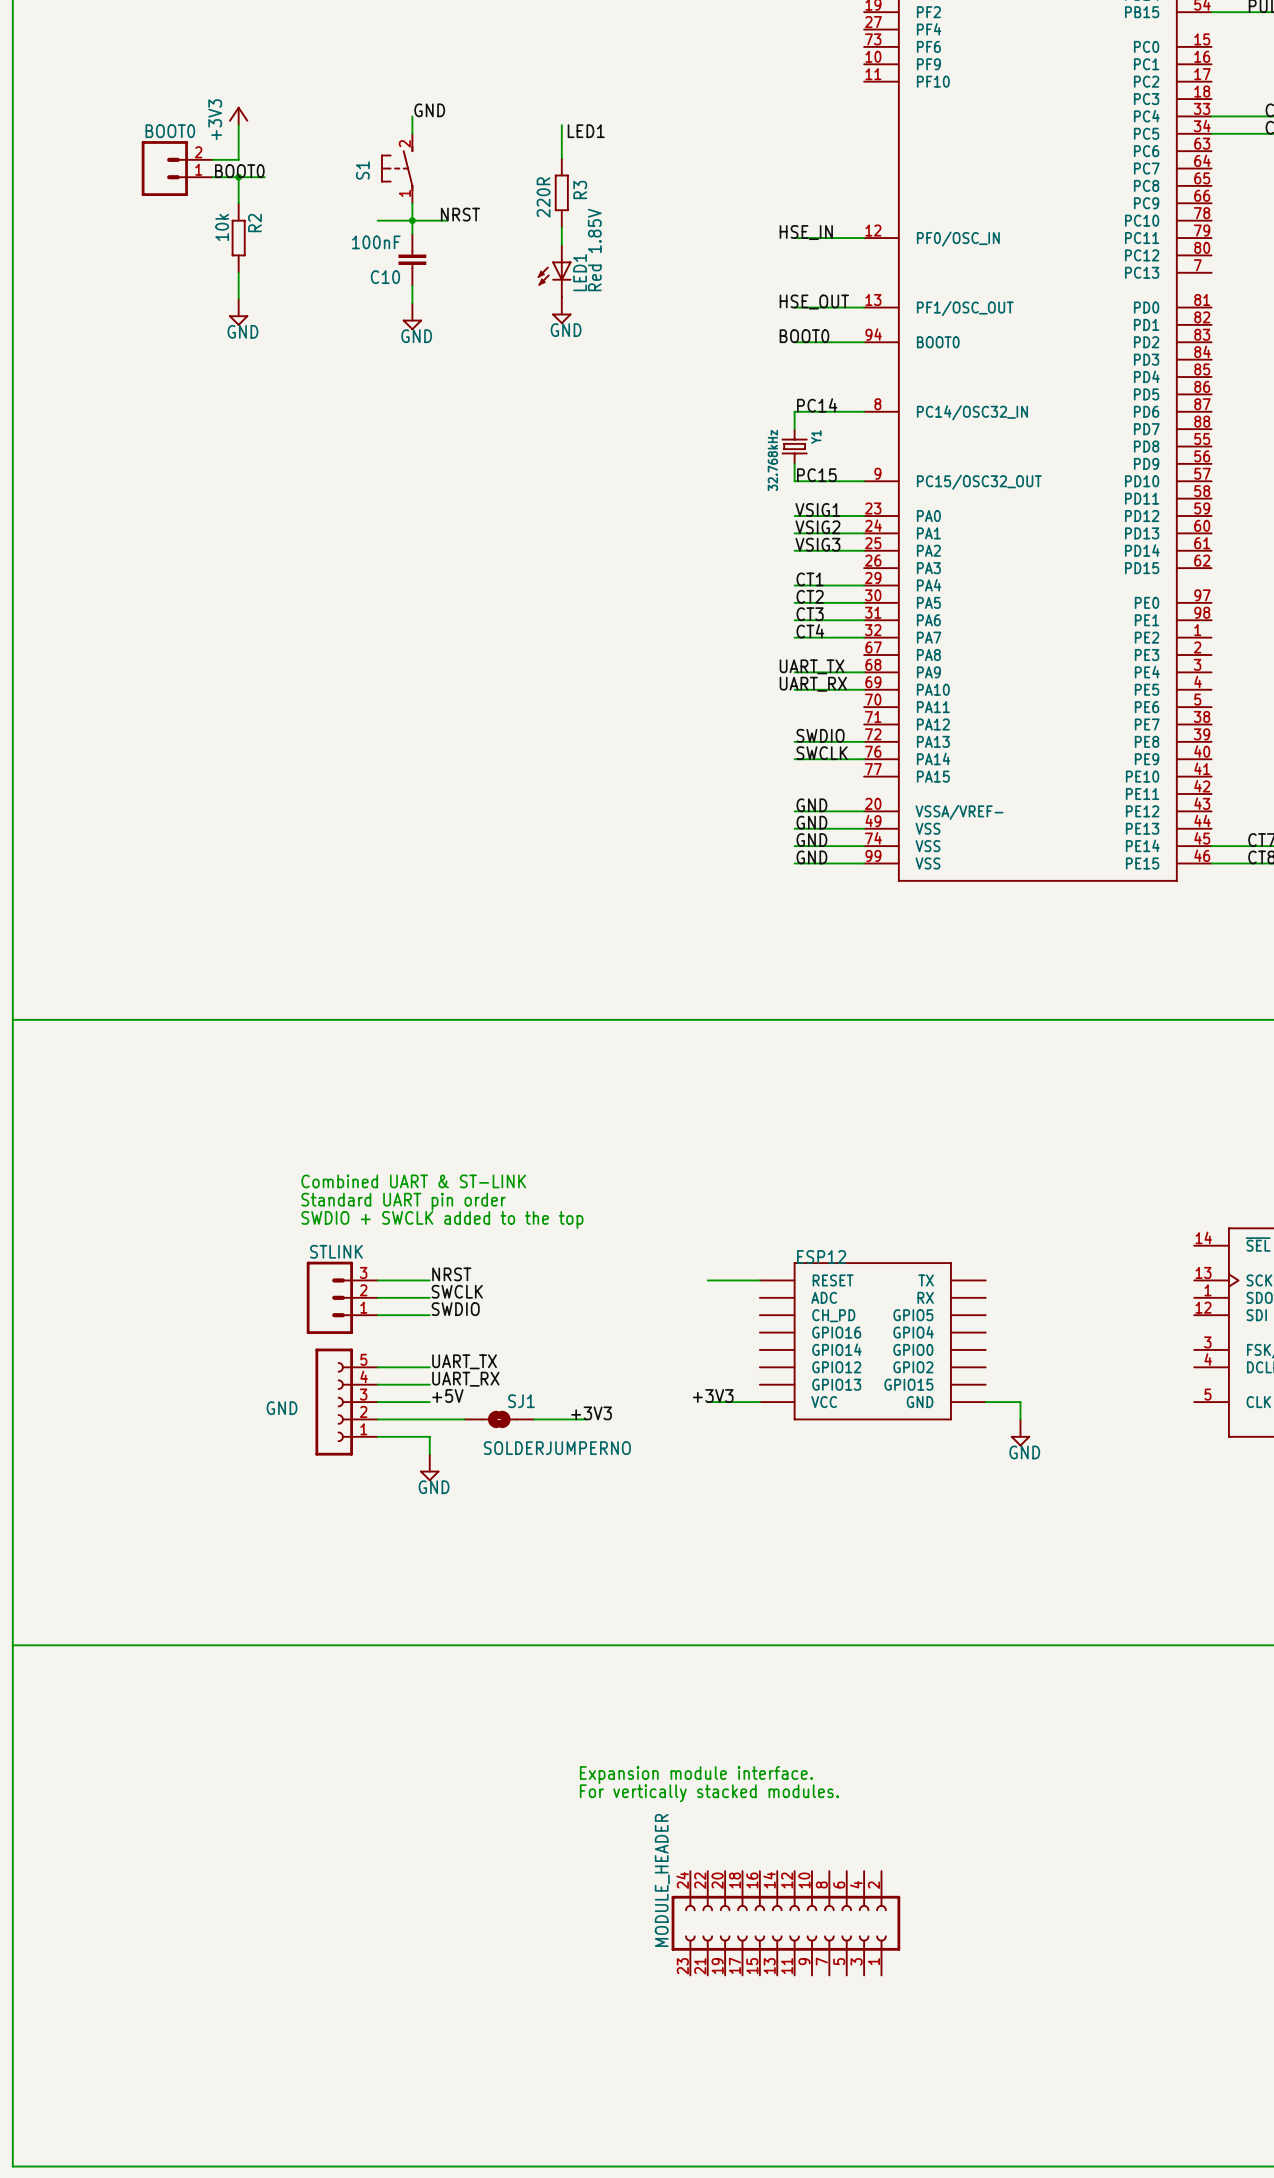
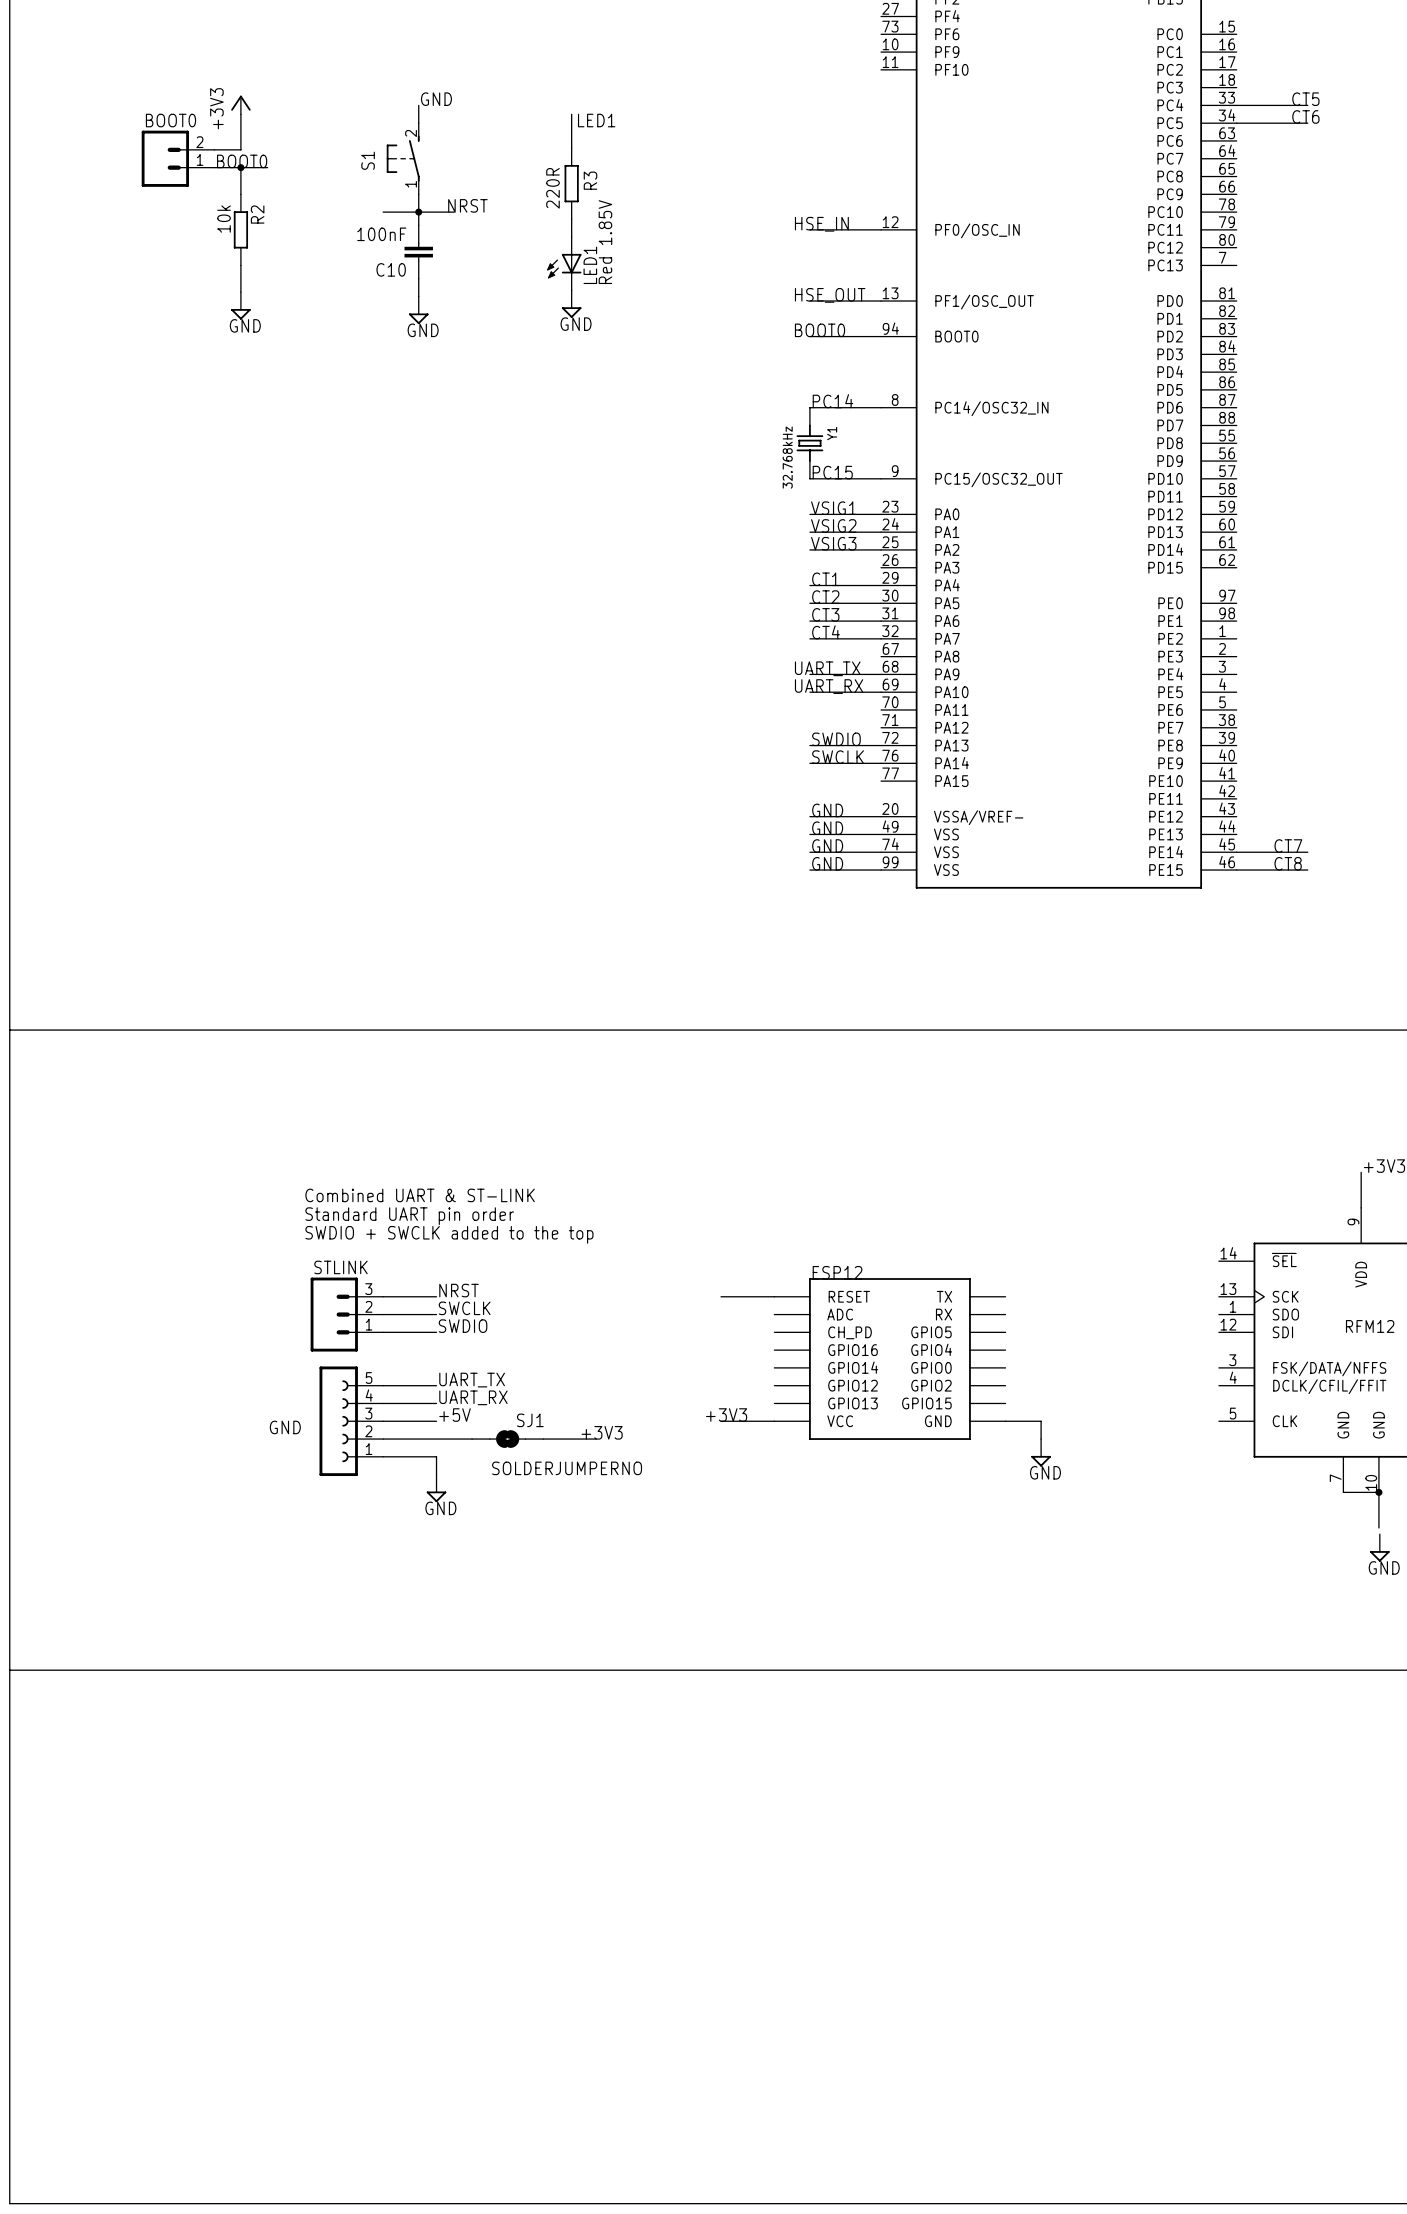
text: Expansion module interface. (696, 1775) -> none
text: For vertically stacked modules. (709, 1793) -> none
MODULE_HEADER: (785, 1923) -> none

